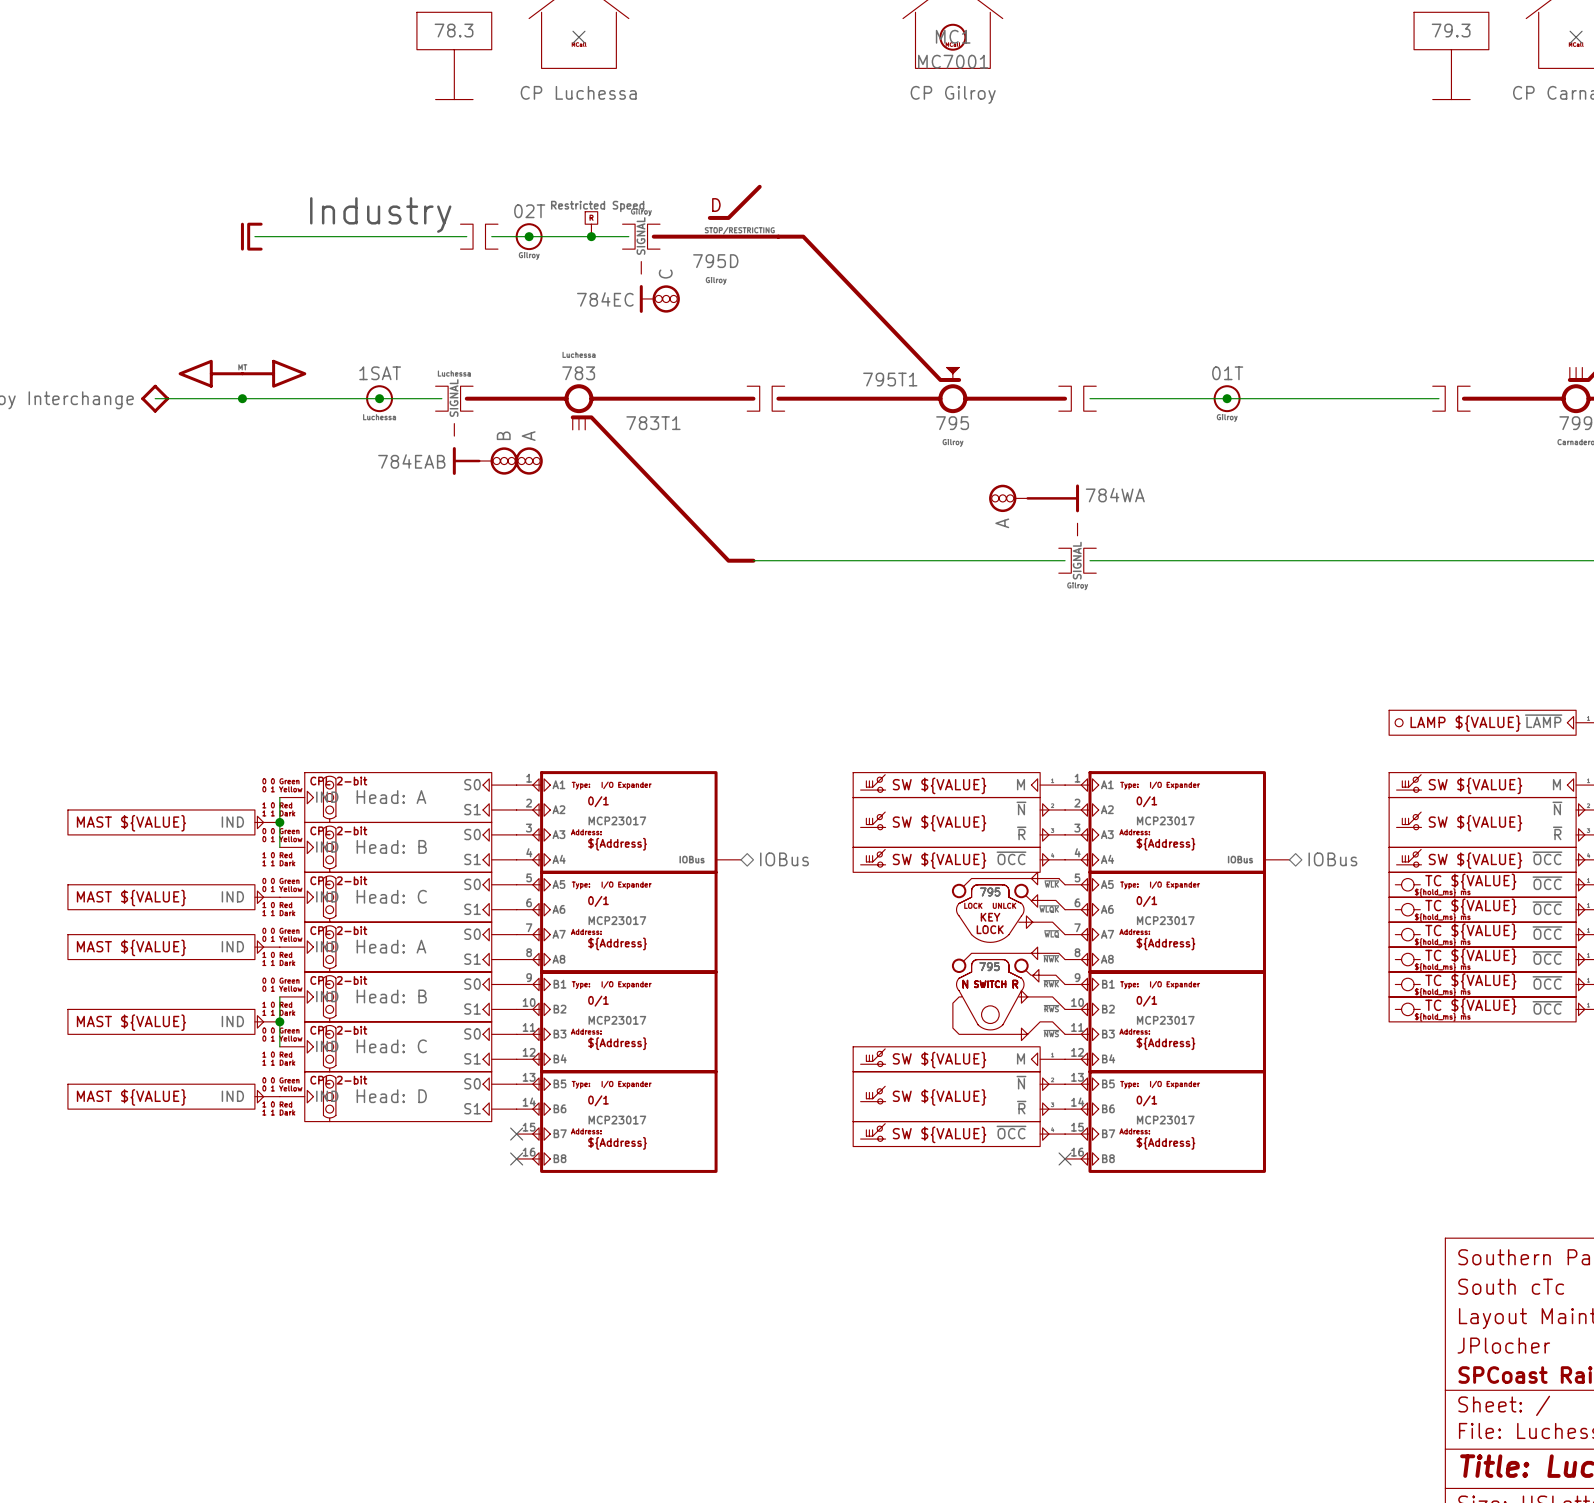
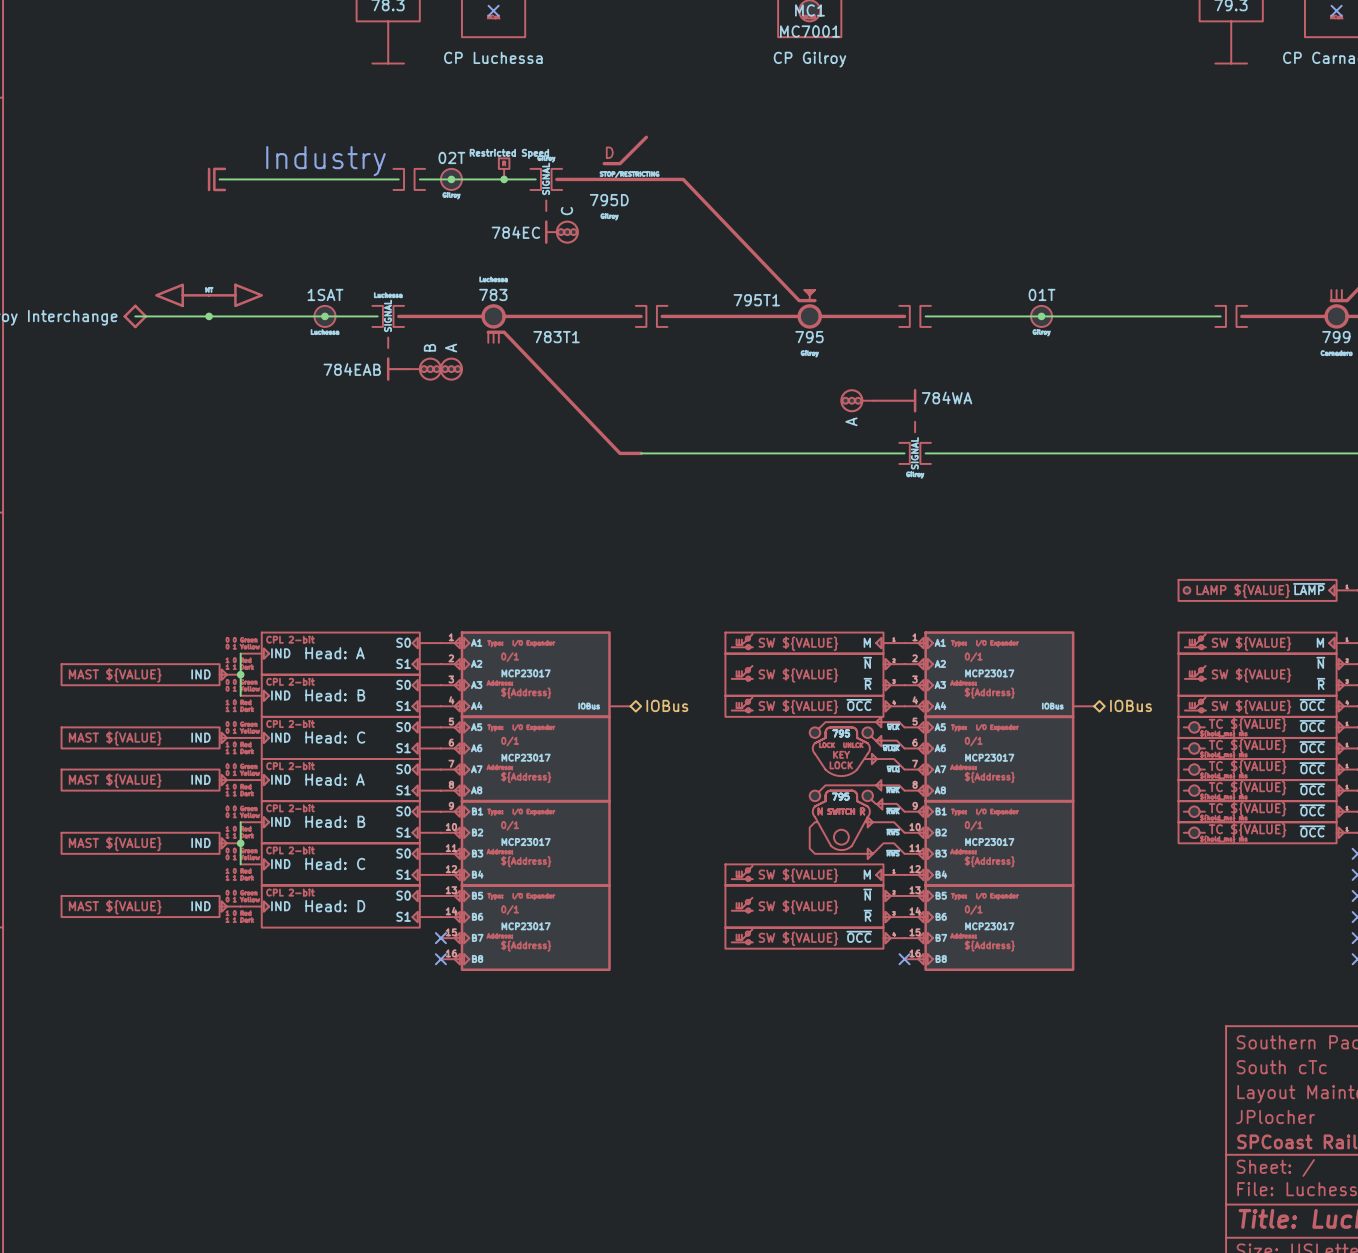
part symbol: [279, 772, 517, 823] -> [240, 632, 441, 675]
part symbol: [279, 822, 517, 873] -> [240, 674, 441, 717]
part symbol: [279, 872, 517, 923] -> [240, 716, 441, 760]
part symbol: [279, 922, 517, 973] -> [240, 759, 441, 802]
part symbol: [279, 972, 517, 1022] -> [240, 801, 441, 844]
part symbol: [279, 1021, 517, 1072] -> [240, 843, 441, 886]
part symbol: [279, 1071, 517, 1122] -> [240, 885, 441, 928]

